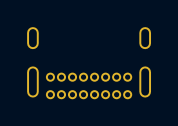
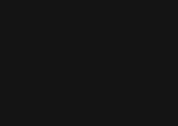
part: (89, 63) -> none

